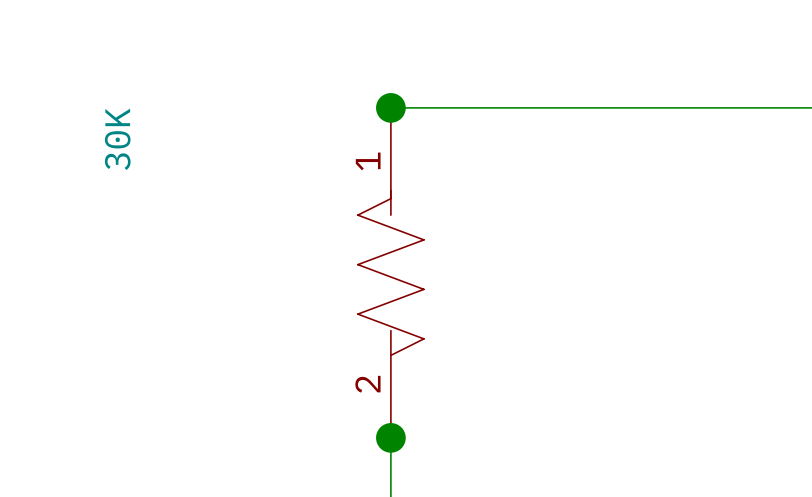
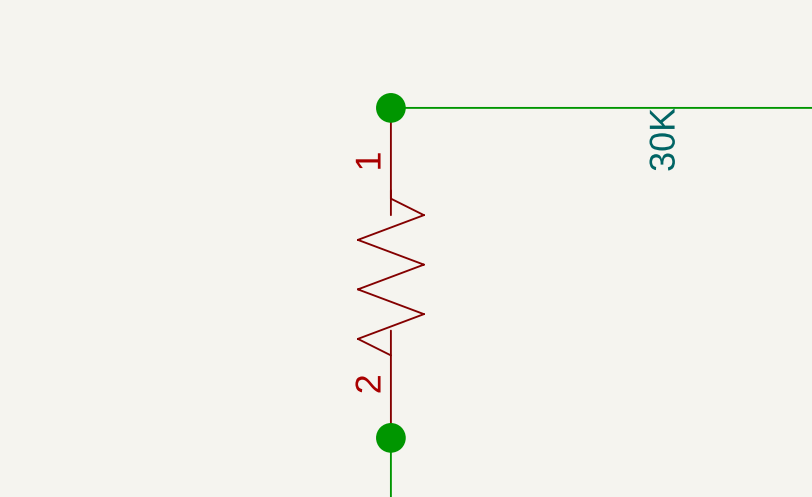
part flip: as is (390, 272) -> left-right (390, 272)

